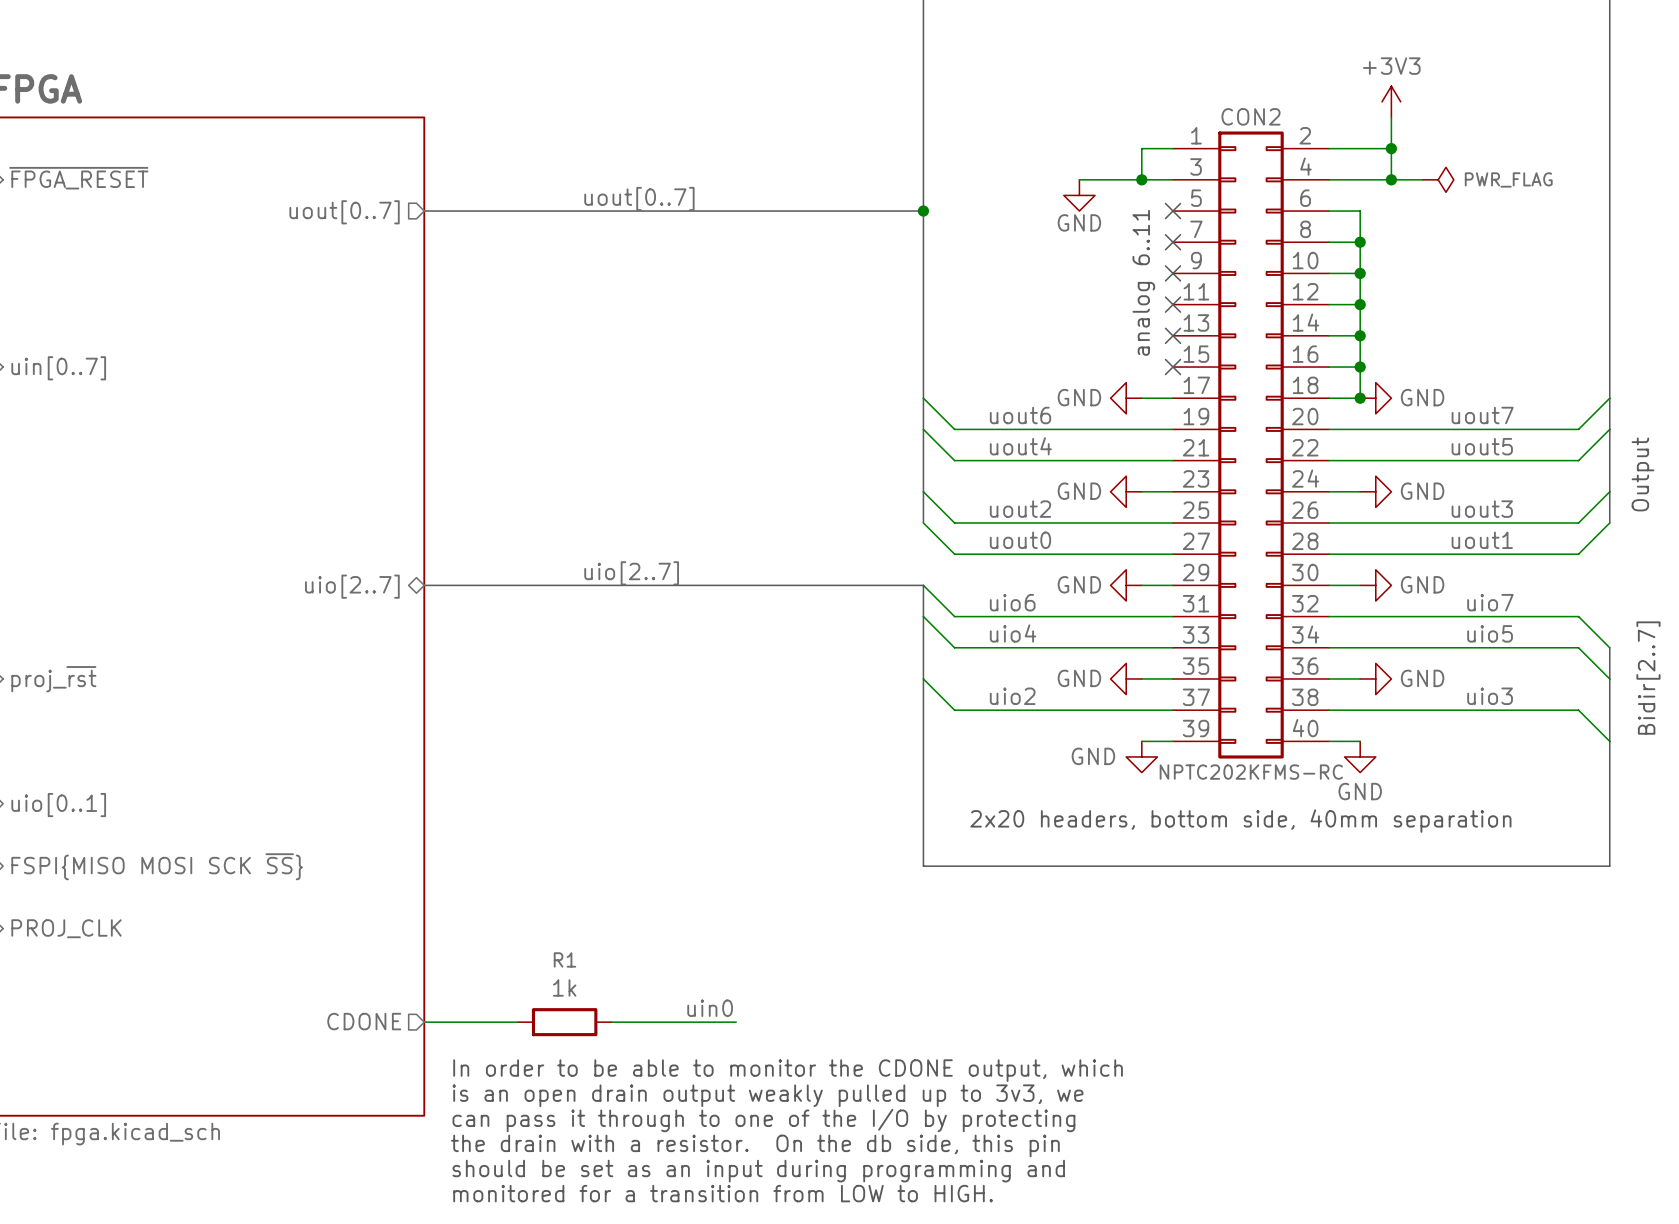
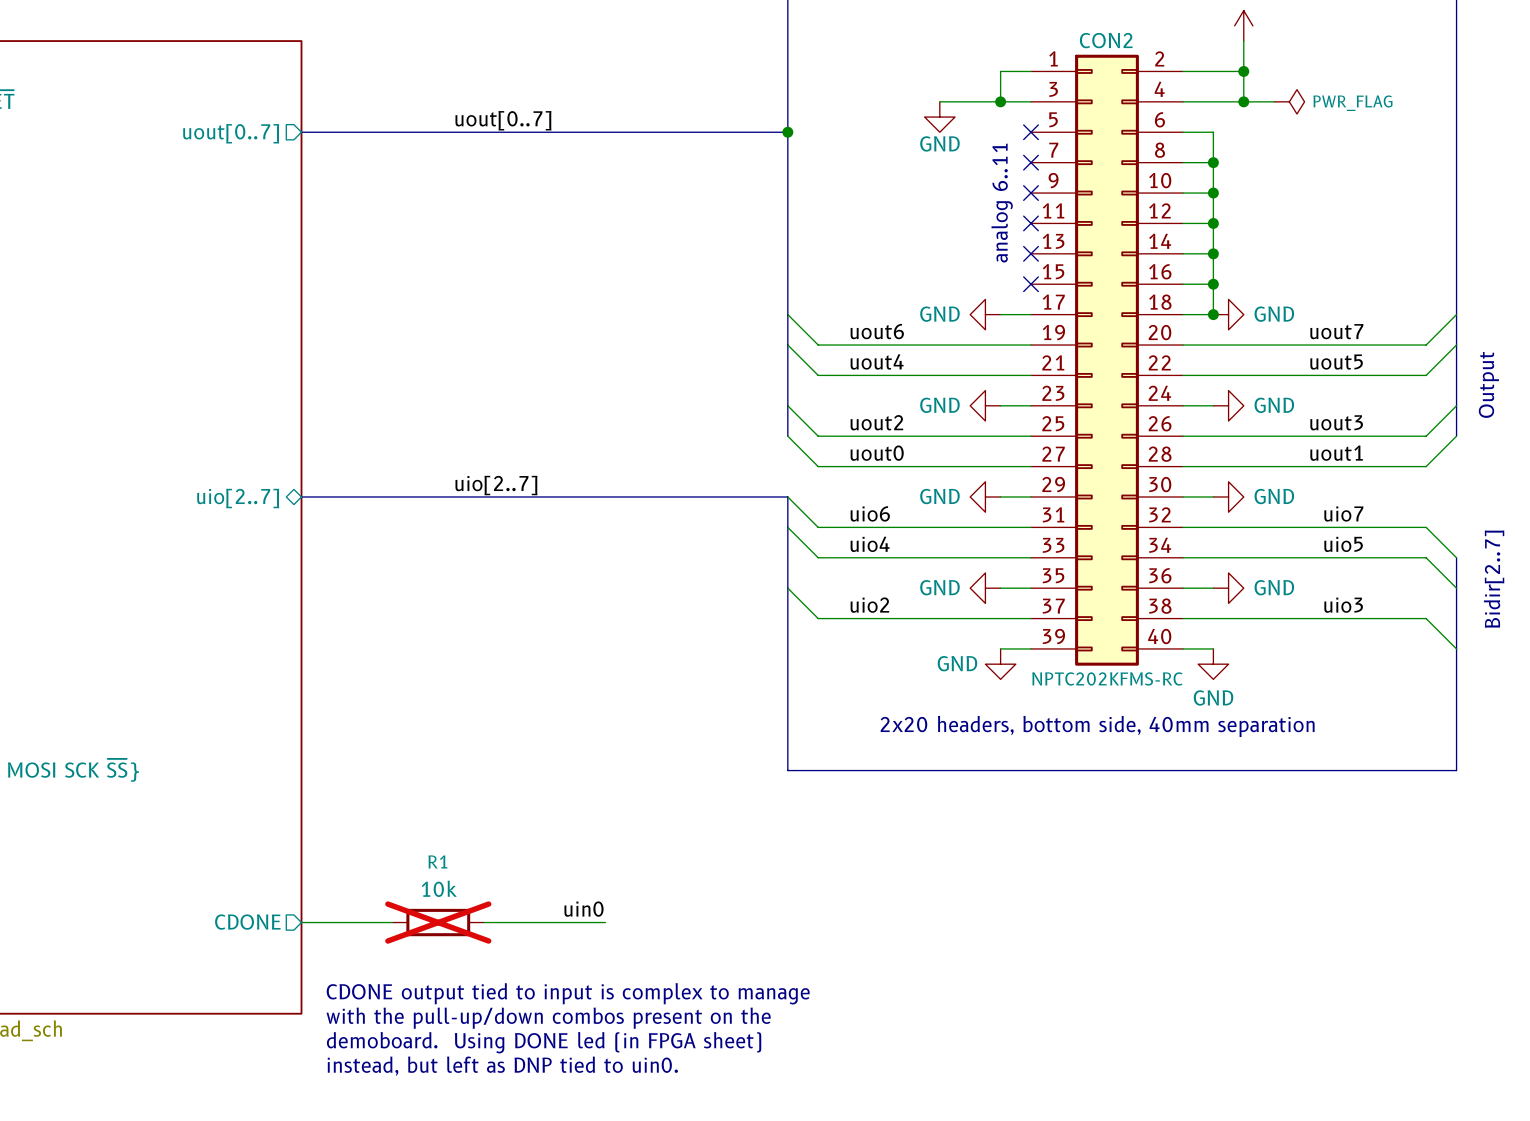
R1 value: 1k (564, 987) -> 10k (439, 888)
R1 do-not-place cross: none -> (438, 922)
text: In order to be able to monitor the CDONE output, which (788, 1070) -> none
text: is an open drain output weakly pulled up to 3v3, we (768, 1095) -> CDONE output tied to input is complex to manage (568, 993)
text: can pass it through to one of the I/O by protecting (763, 1120) -> with the pull-up/down combos present on the (548, 1018)
text: the drain with a resistor. On the db side, this pin (755, 1145) -> demoboard. Using DONE led (in FPGA sheet) (544, 1042)
text: should be set as an input during programming and (758, 1171) -> instead, but left as DNP tied to uin0. (502, 1066)
text: monitored for a transition from LOW to HIGH. (723, 1193) -> none

